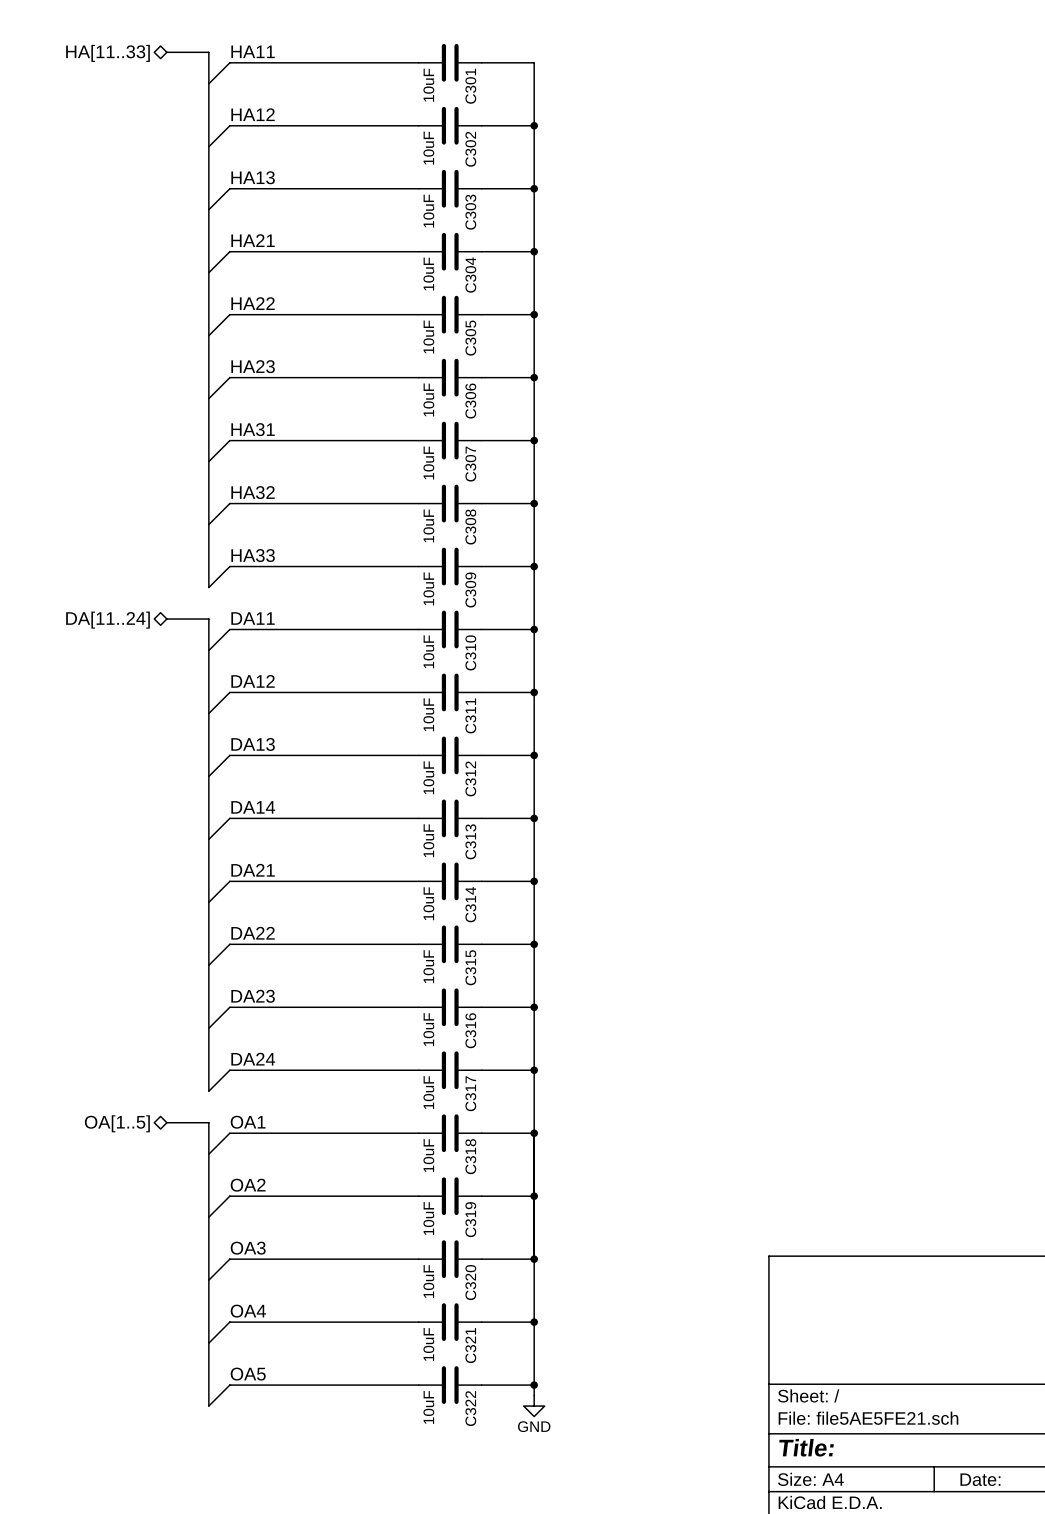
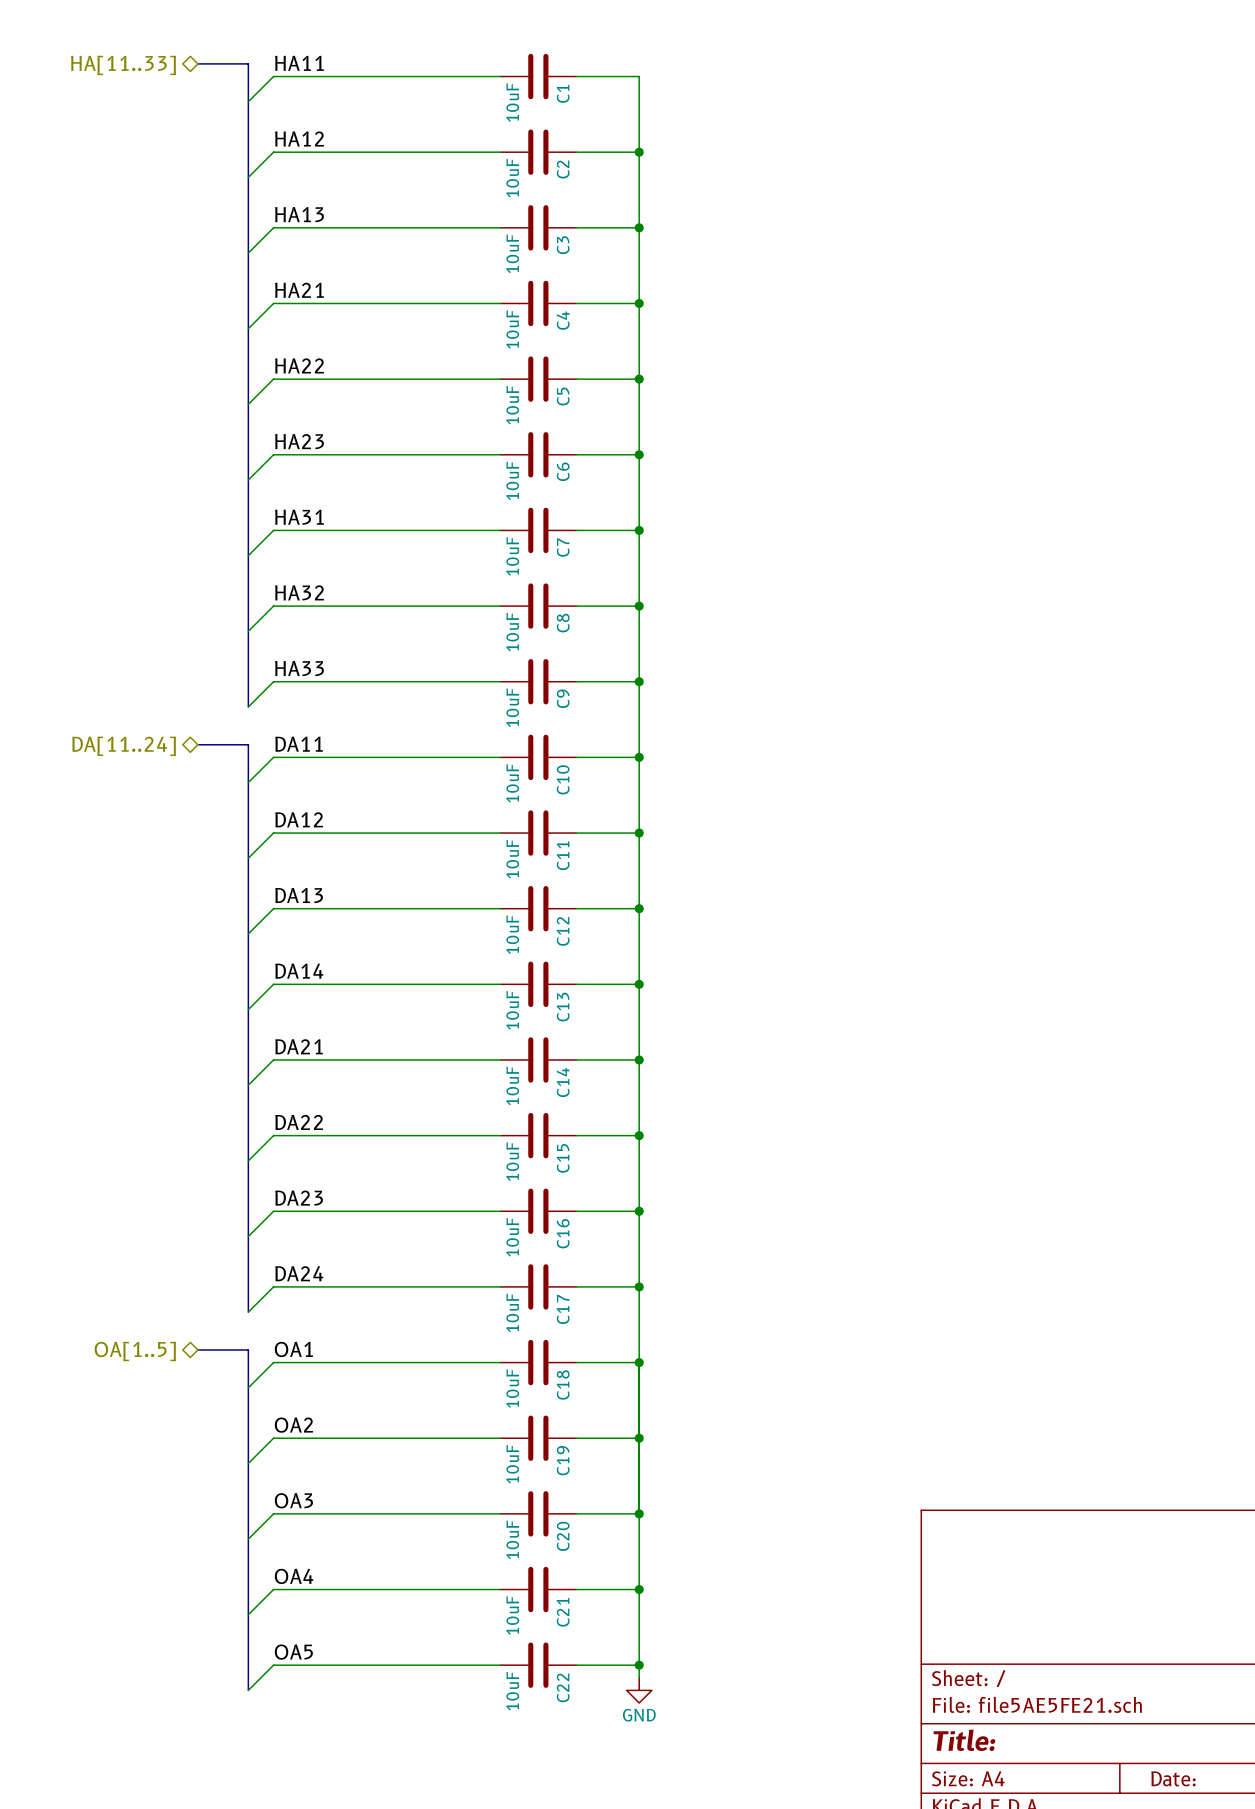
C301 name: C301 (470, 86) -> C1 (563, 93)
C302 name: C302 (470, 149) -> C2 (563, 169)
C303 name: C303 (470, 212) -> C3 (563, 245)
C304 name: C304 (470, 275) -> C4 (563, 320)
C305 name: C305 (470, 338) -> C5 (563, 396)
C306 name: C306 (470, 401) -> C6 (563, 471)
C307 name: C307 (470, 464) -> C7 (563, 547)
C308 name: C308 (470, 526) -> C8 (563, 623)
C309 name: C309 (470, 589) -> C9 (563, 698)
C310 name: C310 (470, 652) -> C10 (563, 779)
C311 name: C311 (470, 715) -> C11 (563, 855)
C312 name: C312 (470, 778) -> C12 (563, 931)
C313 name: C313 (470, 841) -> C13 (563, 1007)
C314 name: C314 (470, 904) -> C14 (563, 1082)
C315 name: C315 (470, 967) -> C15 (563, 1158)
C316 name: C316 (470, 1030) -> C16 (563, 1233)
C317 name: C317 (470, 1093) -> C17 (563, 1309)
C318 name: C318 (470, 1156) -> C18 (563, 1384)
C319 name: C319 (470, 1219) -> C19 (563, 1460)
C320 name: C320 (470, 1282) -> C20 (563, 1536)
C321 name: C321 (470, 1345) -> C21 (563, 1612)
C322 name: C322 (470, 1408) -> C22 (563, 1687)

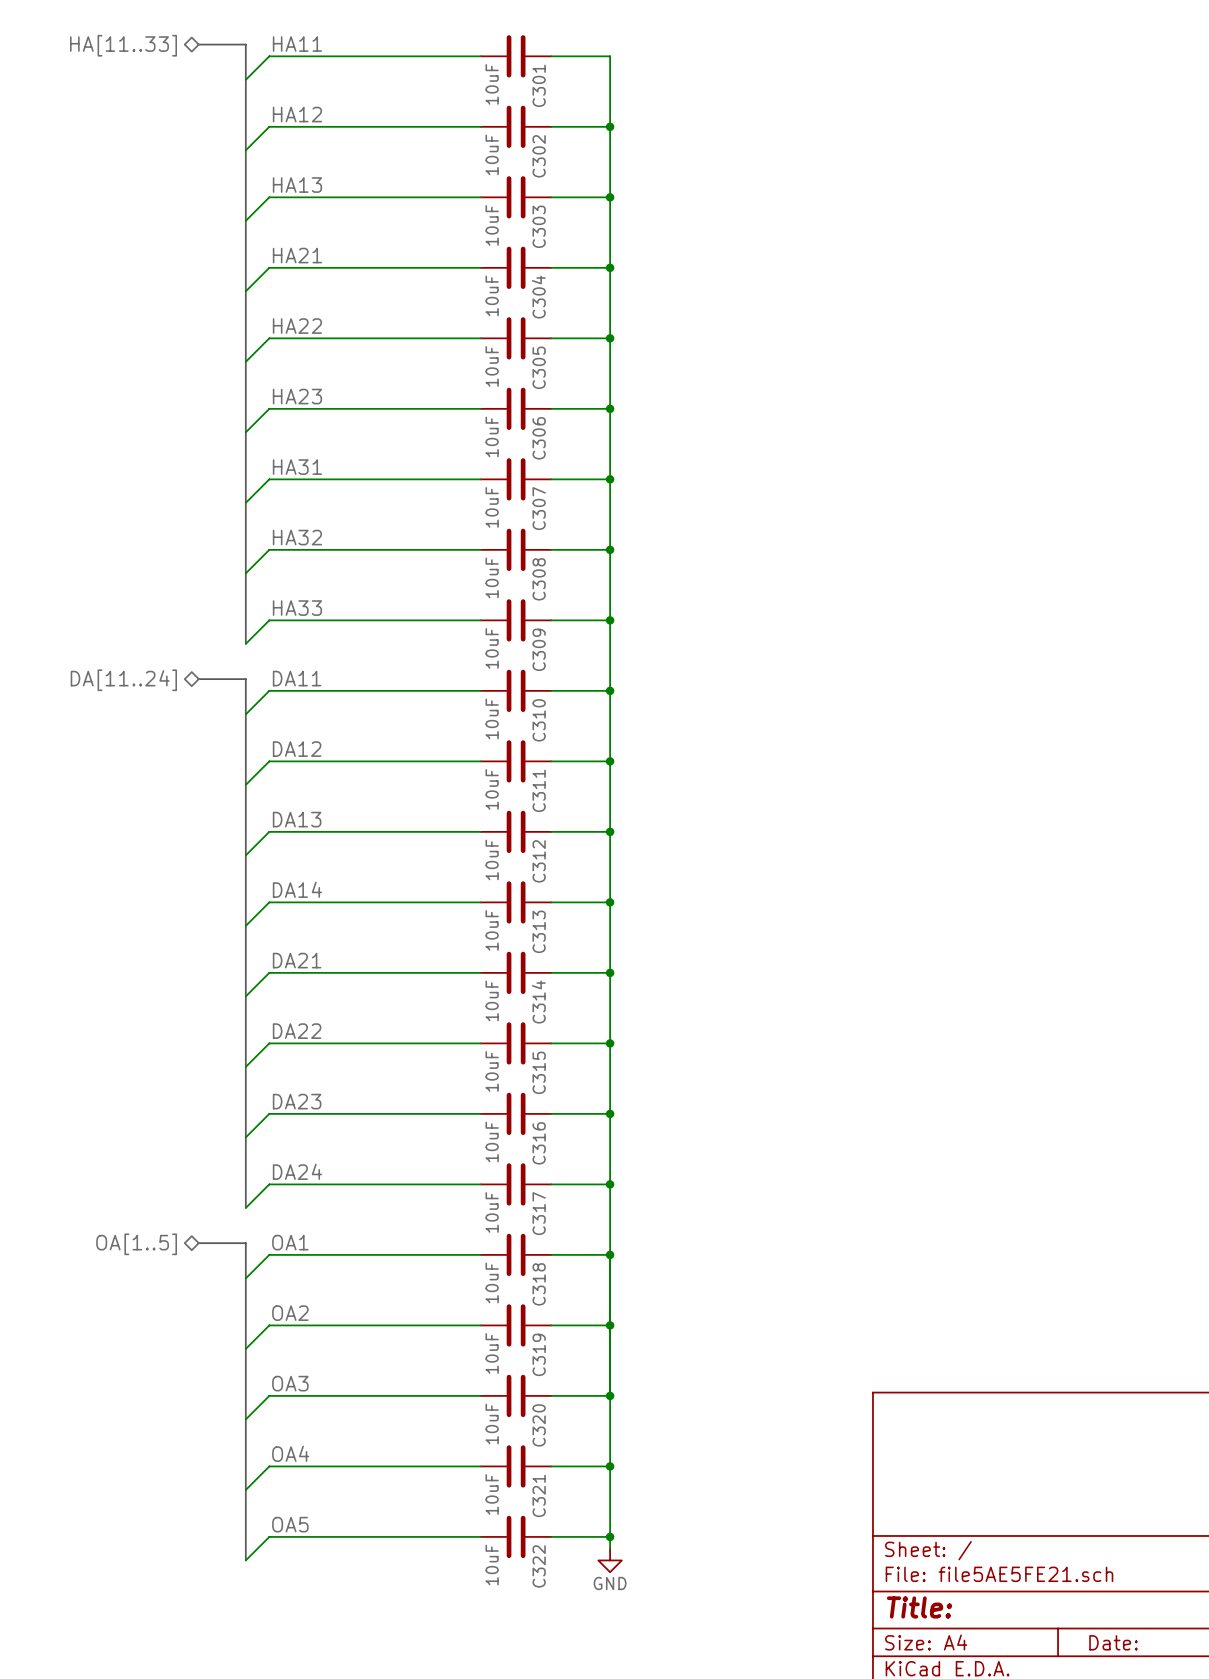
C1 name: C1 (563, 93) -> C301 (539, 85)
C2 name: C2 (563, 169) -> C302 (539, 156)
C3 name: C3 (563, 245) -> C303 (539, 226)
C4 name: C4 (563, 320) -> C304 (538, 297)
C5 name: C5 (563, 396) -> C305 (539, 367)
C6 name: C6 (563, 471) -> C306 (539, 438)
C7 name: C7 (563, 547) -> C307 (539, 508)
C8 name: C8 (563, 623) -> C308 (539, 579)
C9 name: C9 (563, 698) -> C309 (539, 649)
C10 name: C10 (563, 779) -> C310 (539, 720)
C11 name: C11 (563, 855) -> C311 (539, 790)
C12 name: C12 (563, 931) -> C312 (539, 861)
C13 name: C13 (563, 1007) -> C313 (539, 931)
C14 name: C14 (563, 1082) -> C314 (538, 1002)
C15 name: C15 (563, 1158) -> C315 (539, 1072)
C16 name: C16 (563, 1233) -> C316 (539, 1143)
C17 name: C17 (563, 1309) -> C317 (539, 1213)
C18 name: C18 (563, 1384) -> C318 (539, 1284)
C19 name: C19 (563, 1460) -> C319 (539, 1354)
C20 name: C20 (563, 1536) -> C320 (539, 1425)
C21 name: C21 (563, 1612) -> C321 (539, 1495)
C22 name: C22 (563, 1687) -> C322 (539, 1566)

